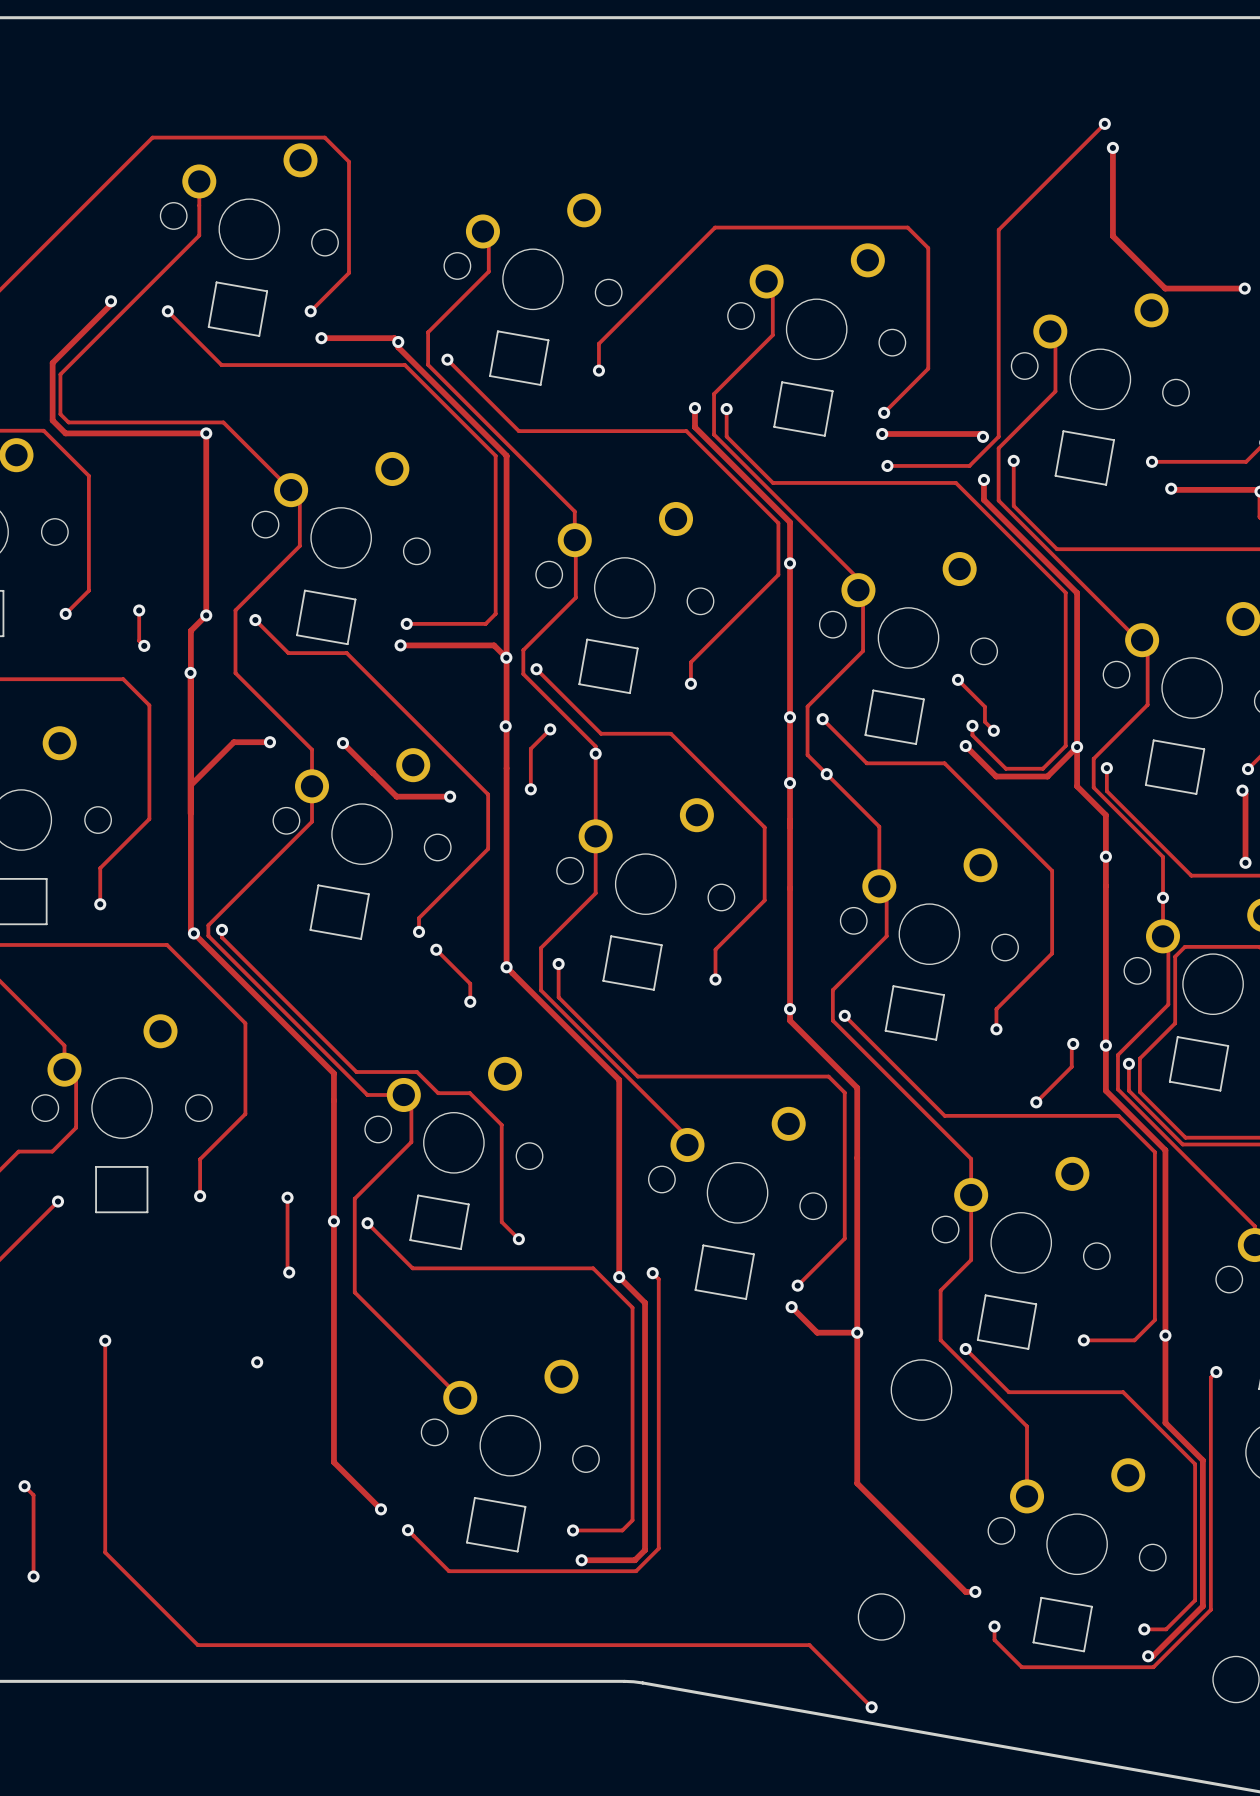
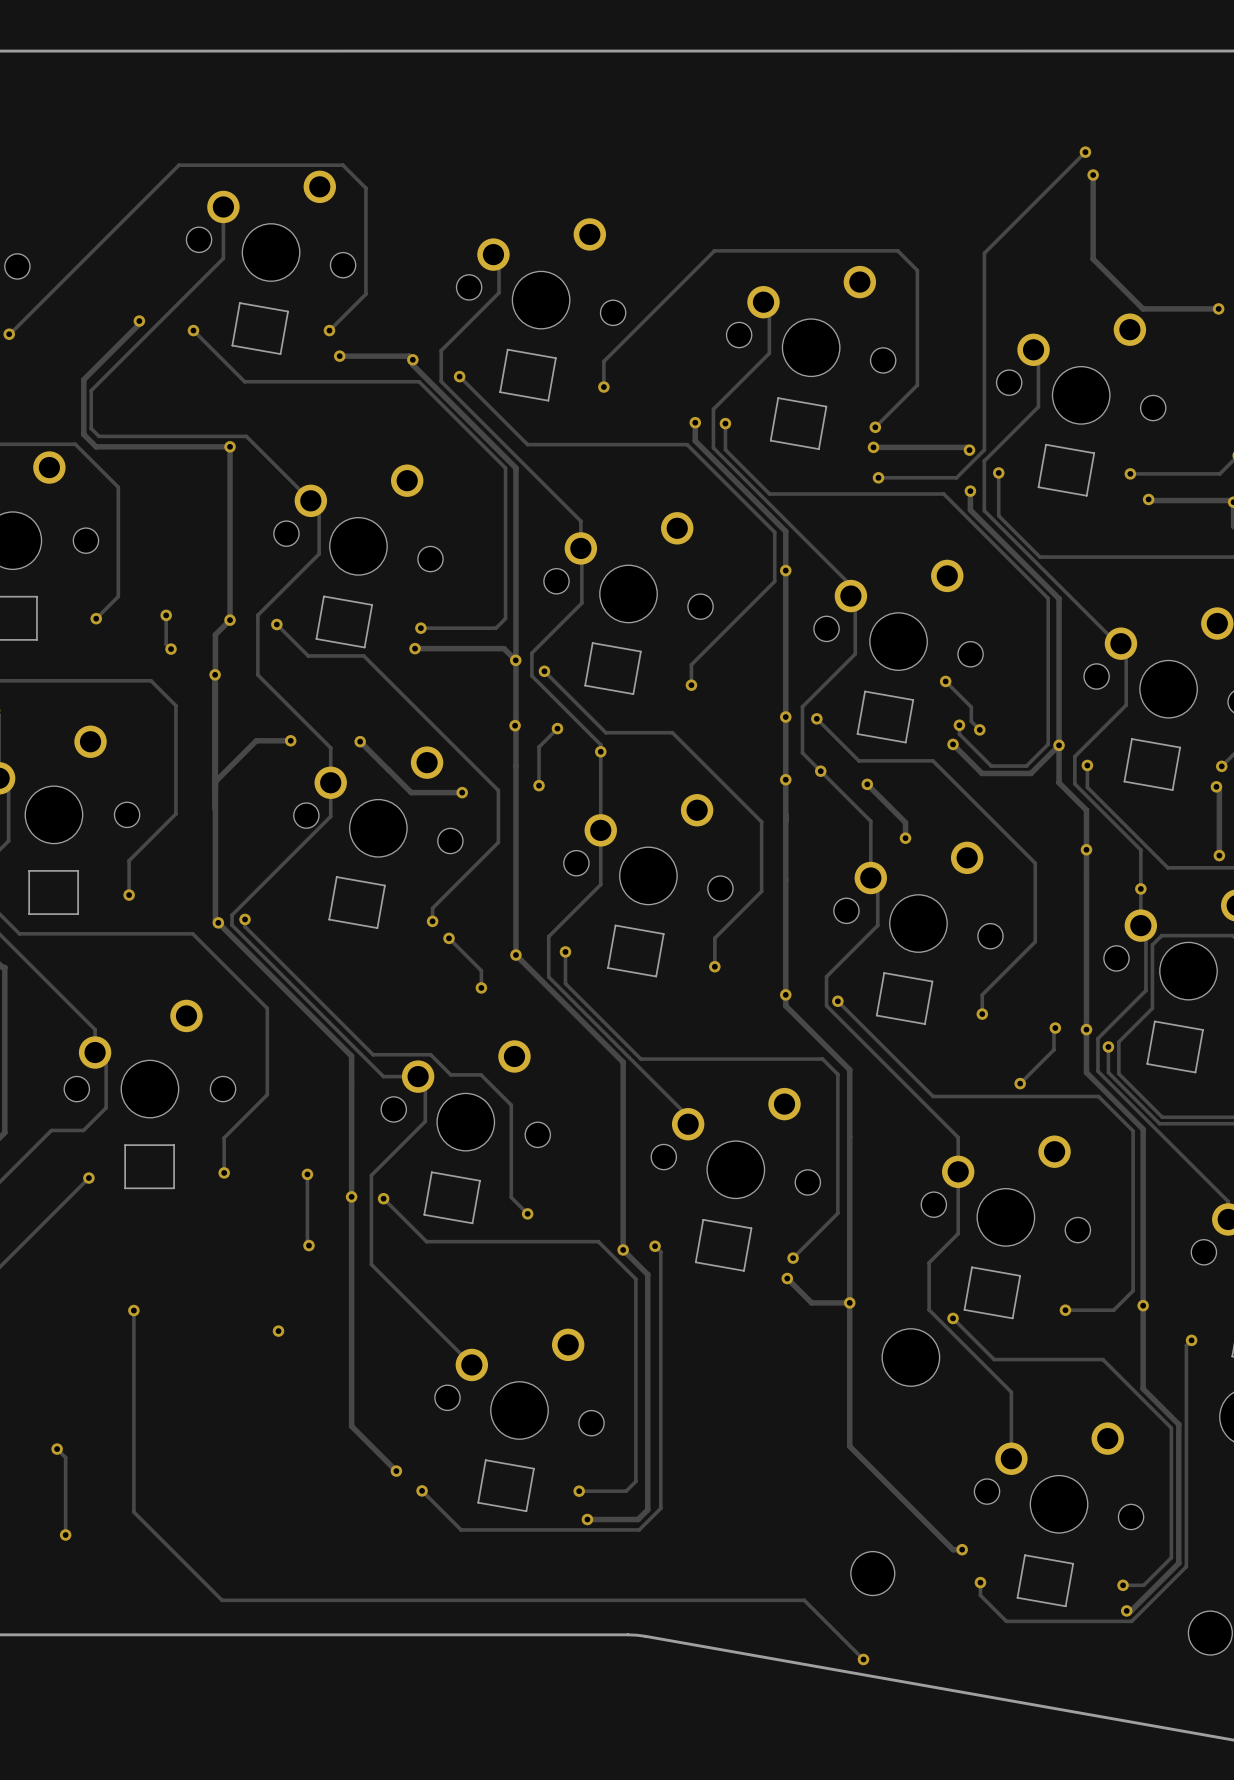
track: none -> (867, 784) (905, 822) (905, 838)
via: none -> (867, 784)
via: none -> (905, 838)

